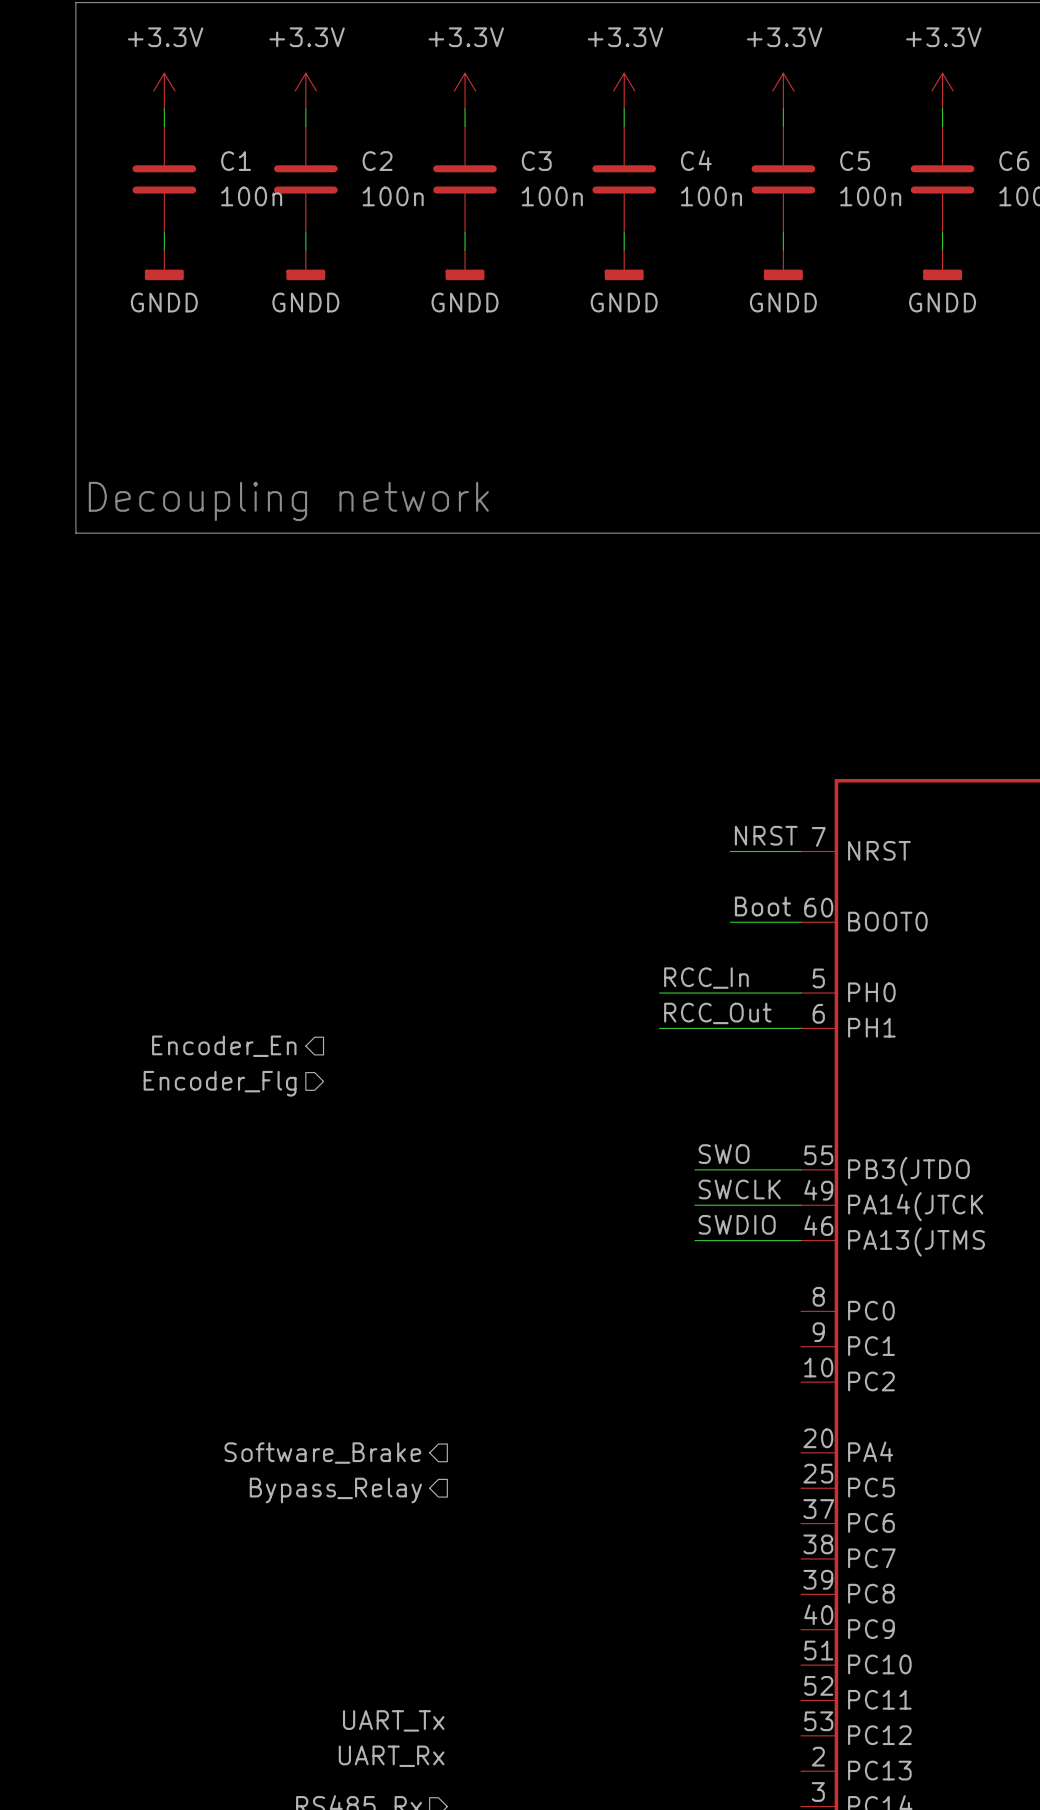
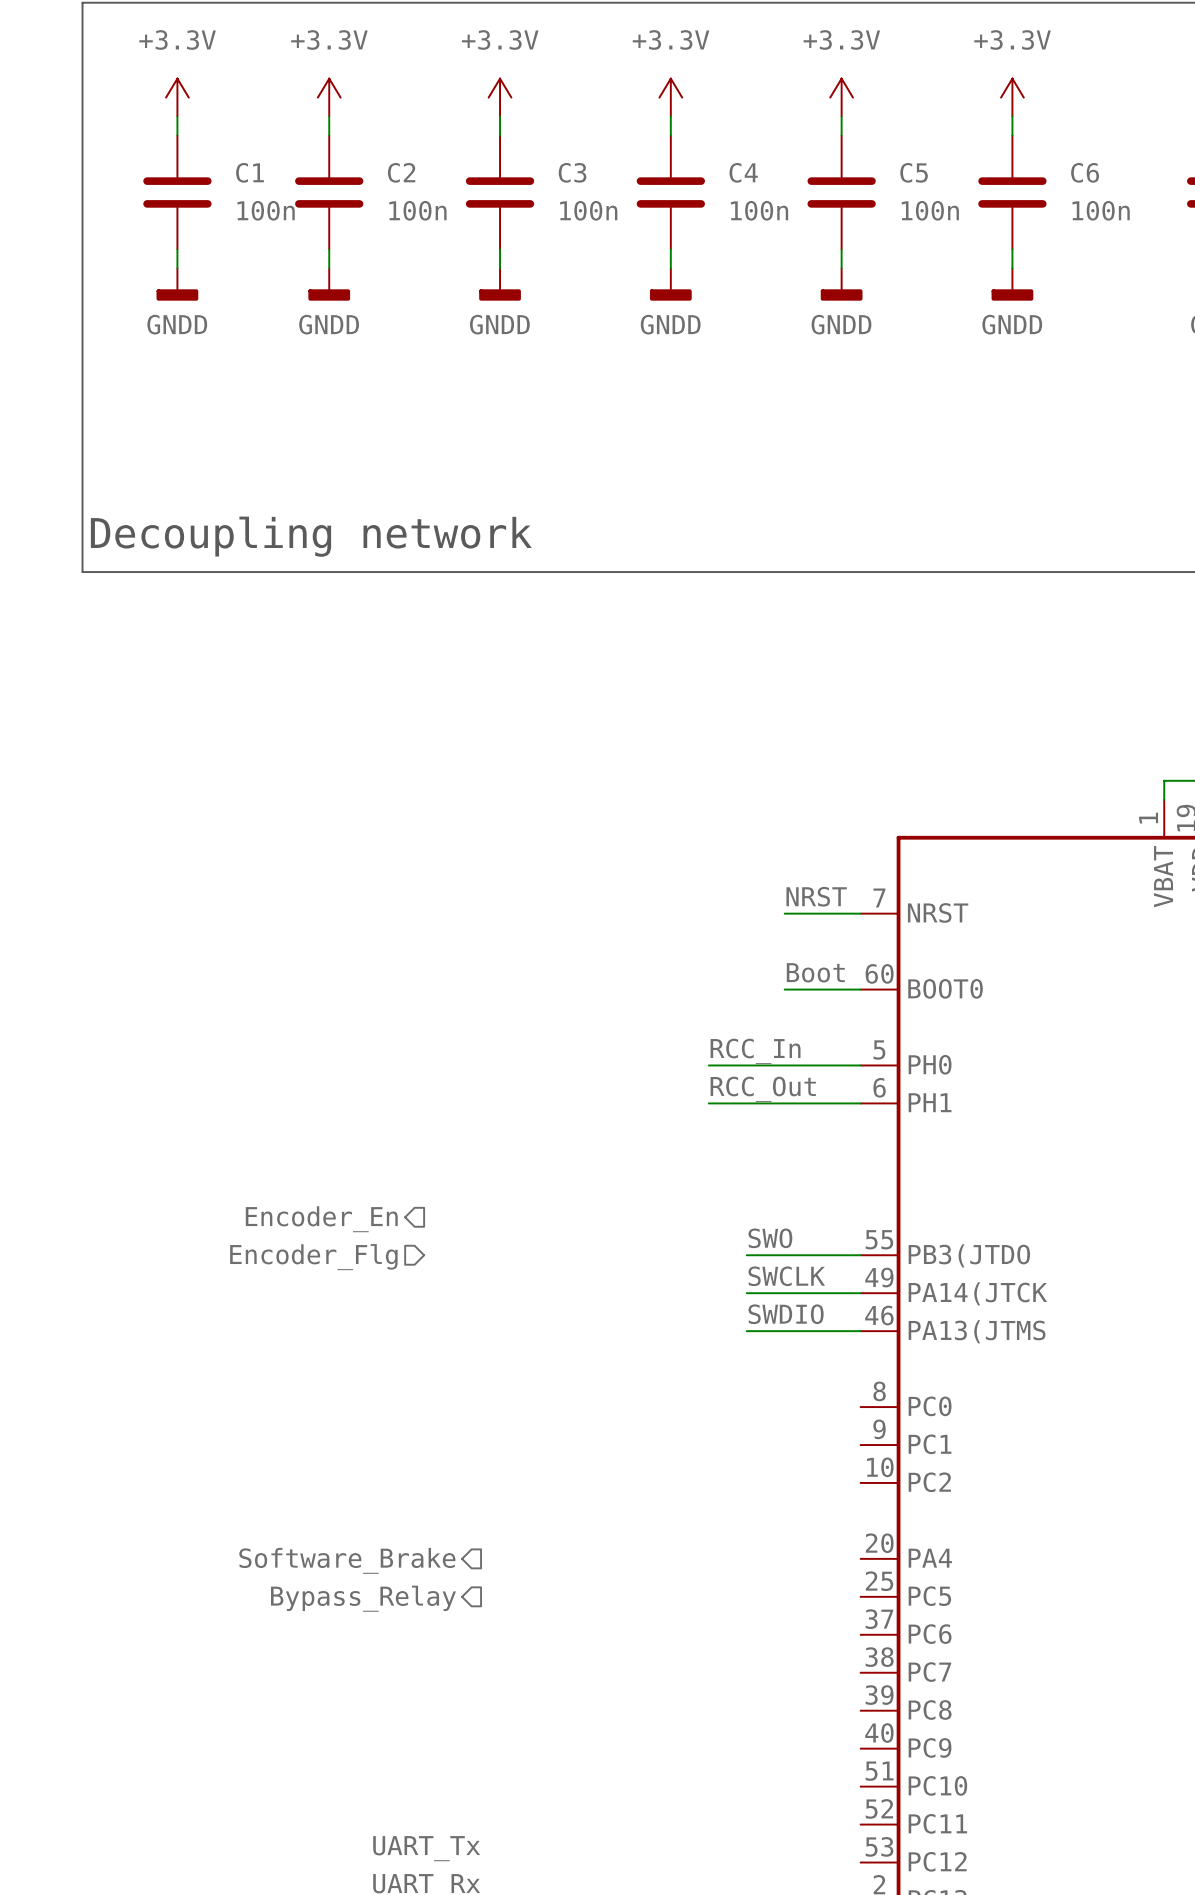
hierarchical label position: Encoder_En (224, 1046) -> Encoder_En (321, 1219)
hierarchical label position: Encoder_Flg (220, 1083) -> Encoder_Flg (313, 1257)

